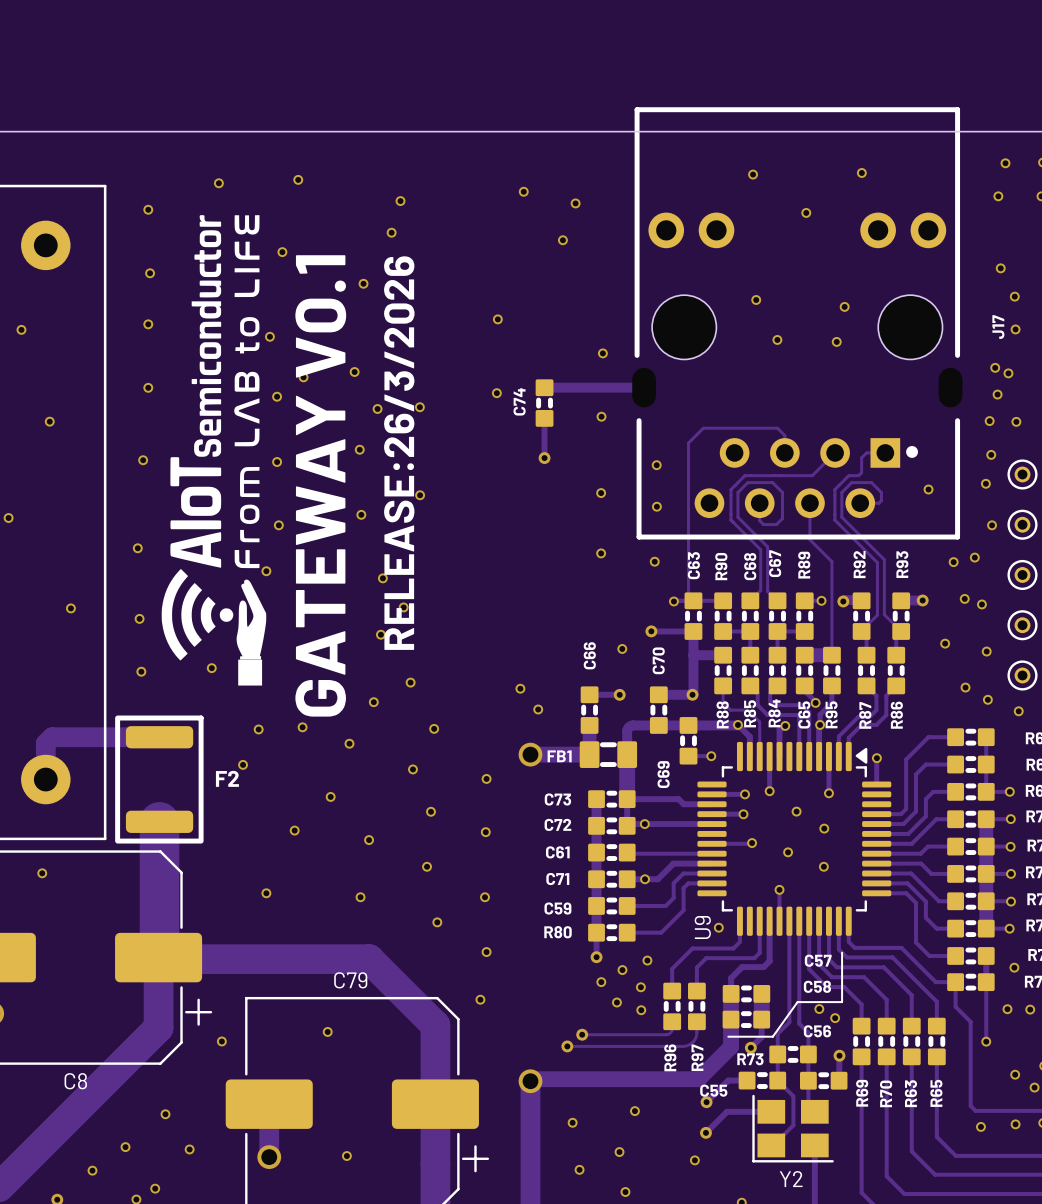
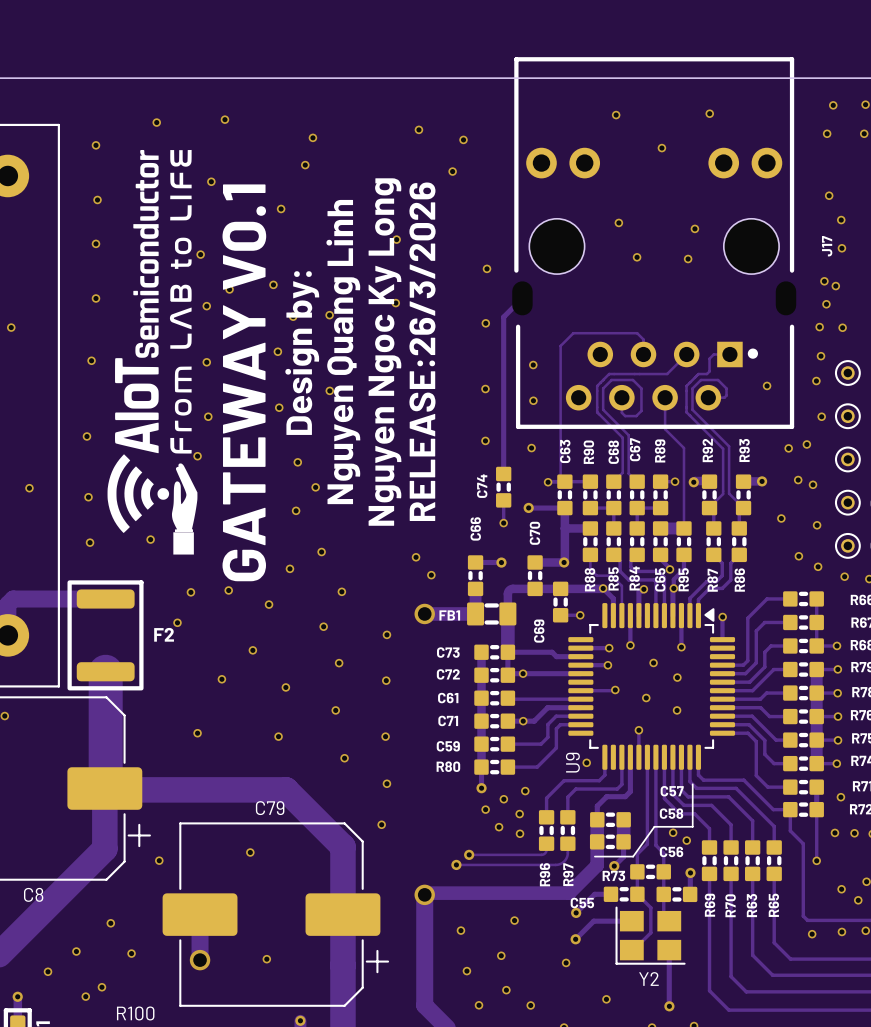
track: (544, 387) (644, 387) -> (503, 473) (503, 317) (522, 298)
C74 position: (544, 403) -> (503, 487)
track: (544, 418) (544, 458) -> none
text: none -> RELEASE:26/3/2026 (422, 351)
text: none -> Nguyen Quang Linh (343, 352)
text: none -> Nguyen Ngoc Ky Long (384, 352)
text: RELEASE:26/3/2026 (399, 453) -> Design by: (302, 353)
via: (544, 458) -> none
track: none -> (503, 500) (503, 523)

